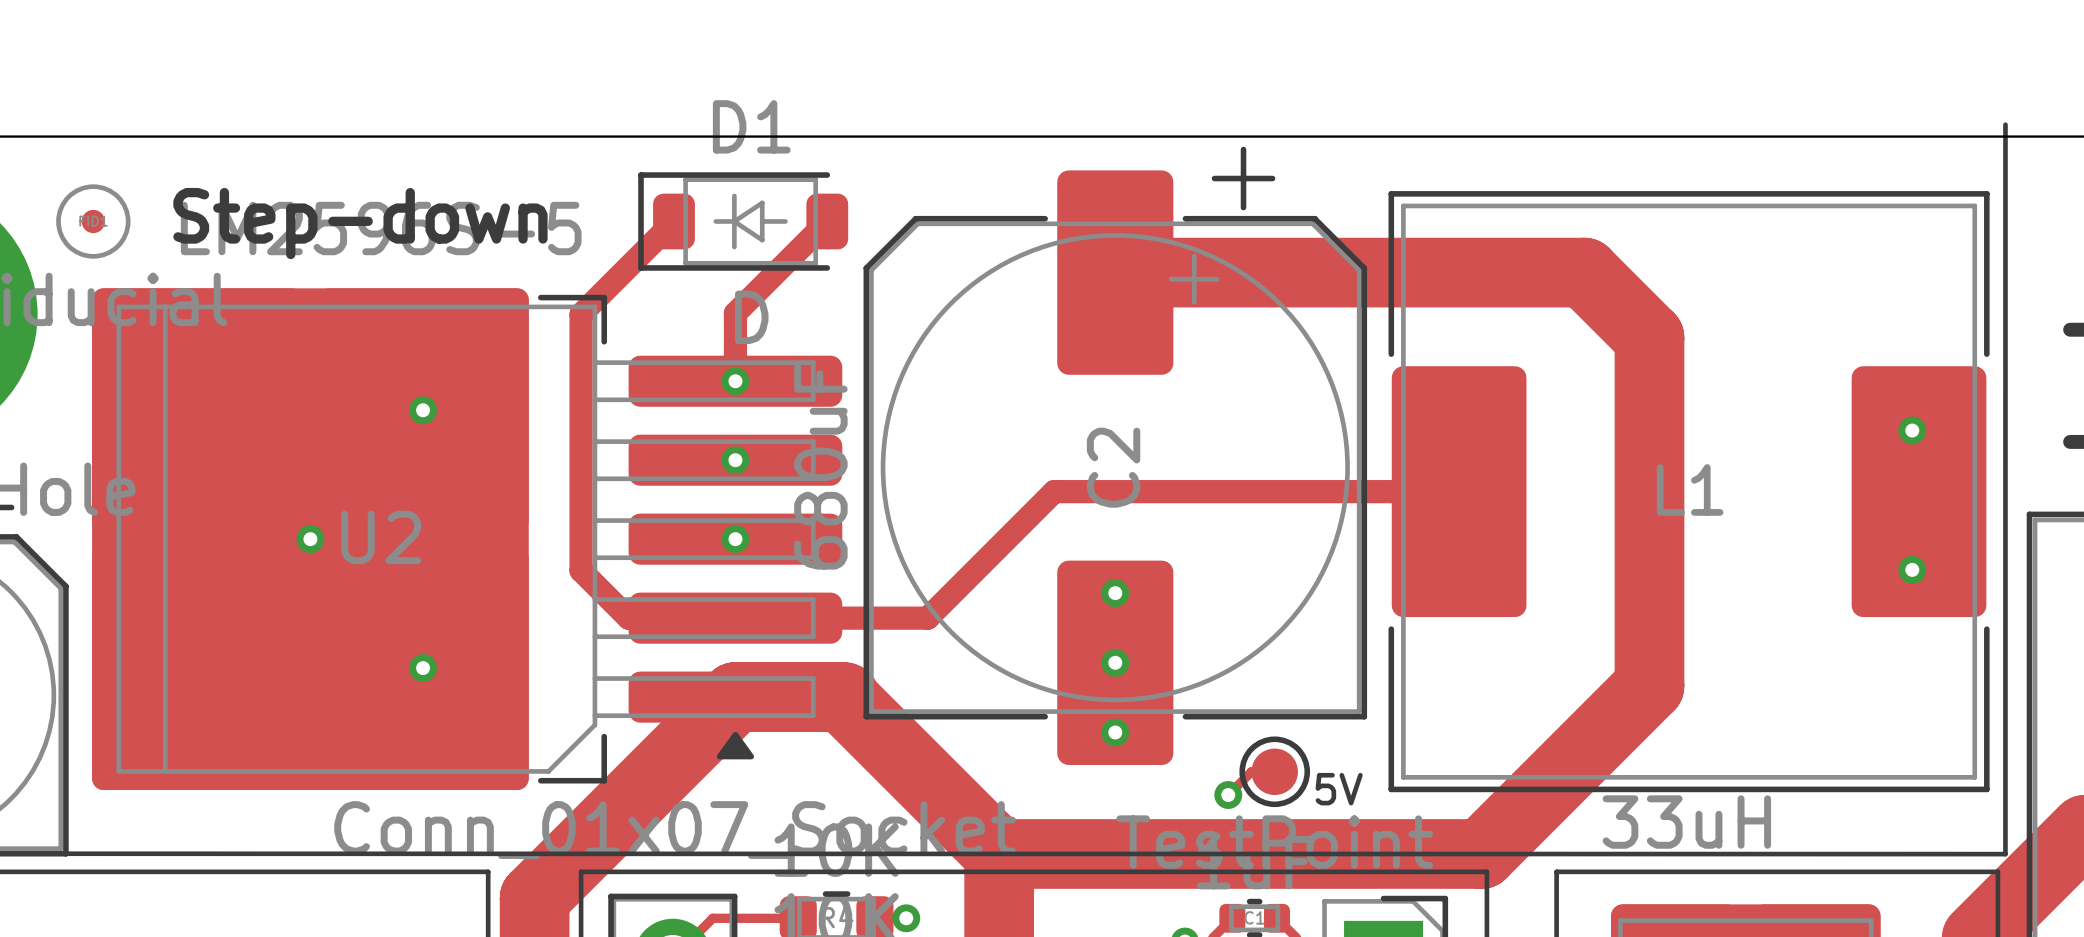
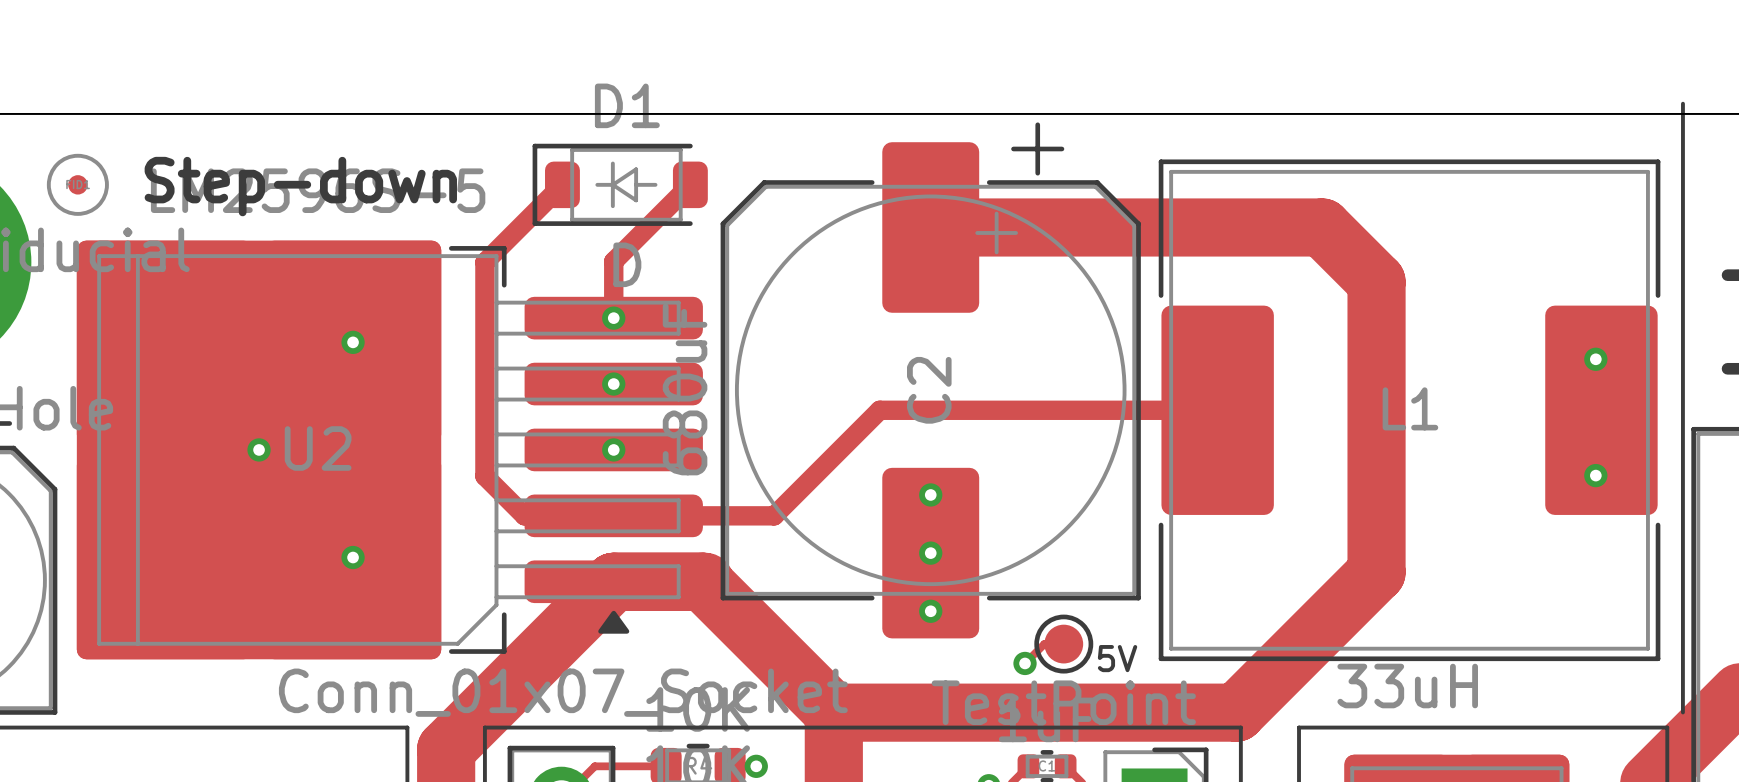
line: (2005, 124) (2005, 854) (65, 853) -> none
line: none -> (1682, 103) (1682, 712)

